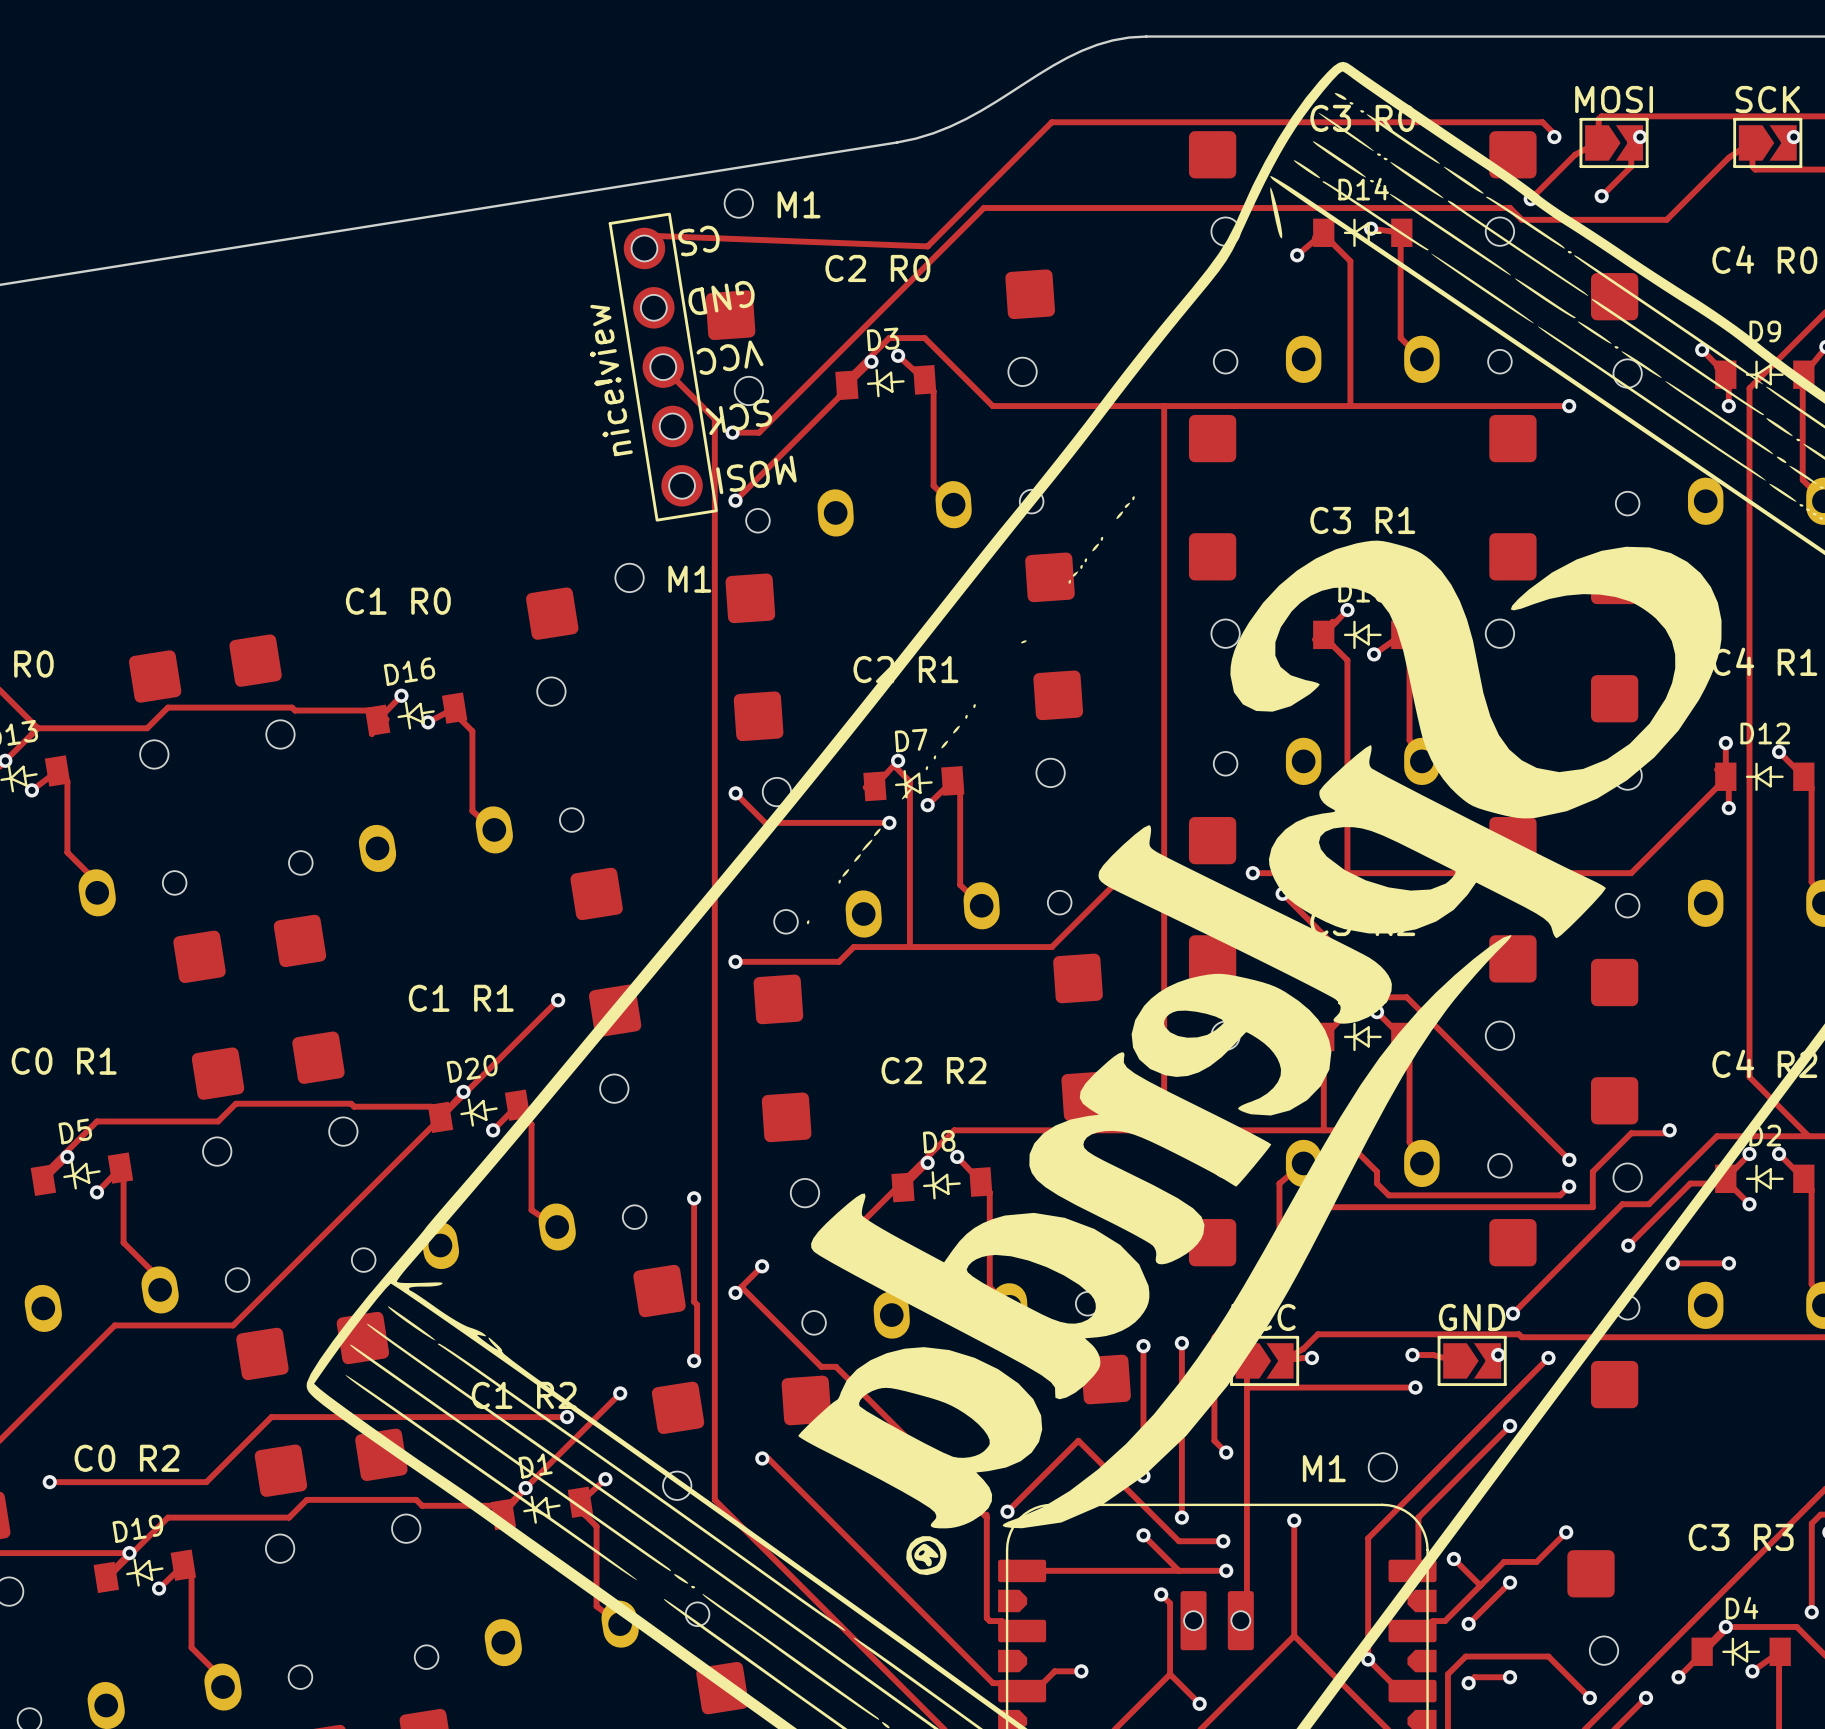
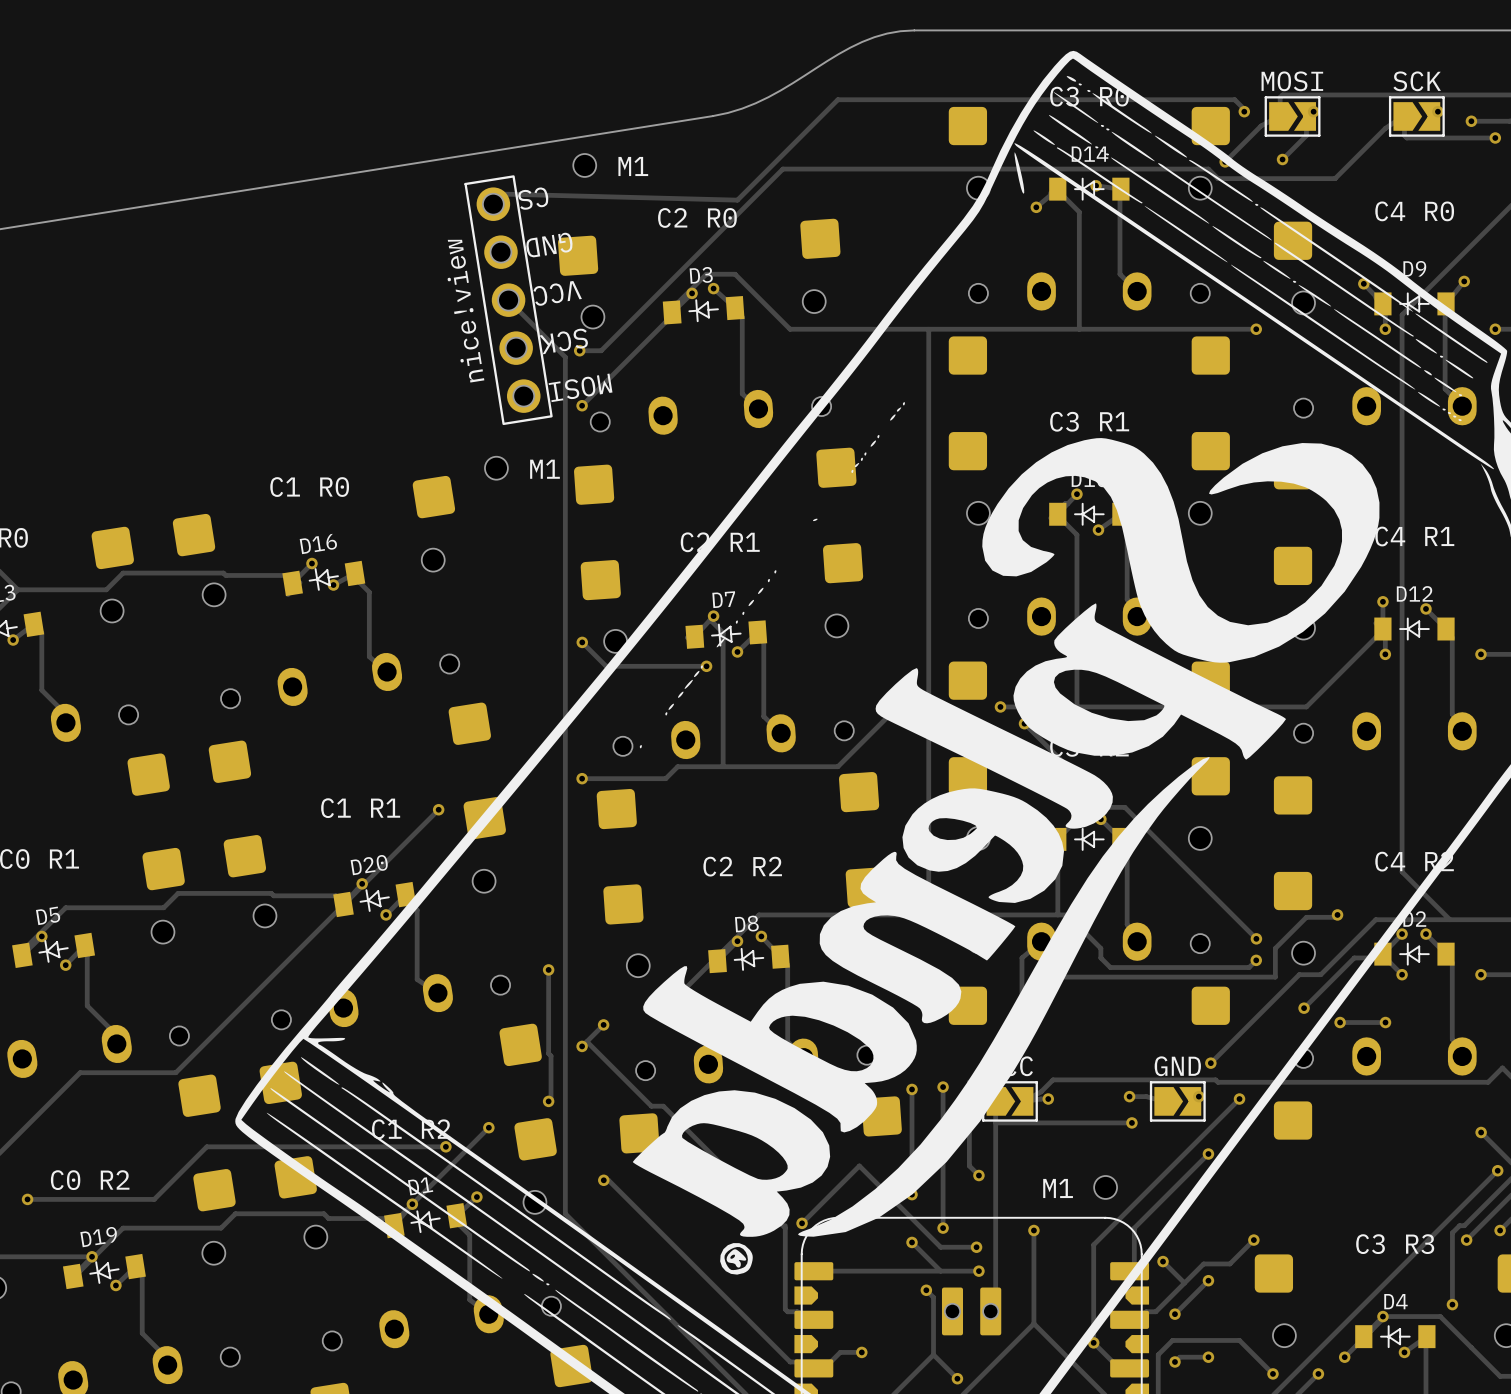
track: (659, 236) (927, 246) -> (505, 194) (737, 200)
part position: (663, 367) -> (508, 300)
track: (676, 380) (714, 418) (714, 440) -> (519, 311) (565, 357)

